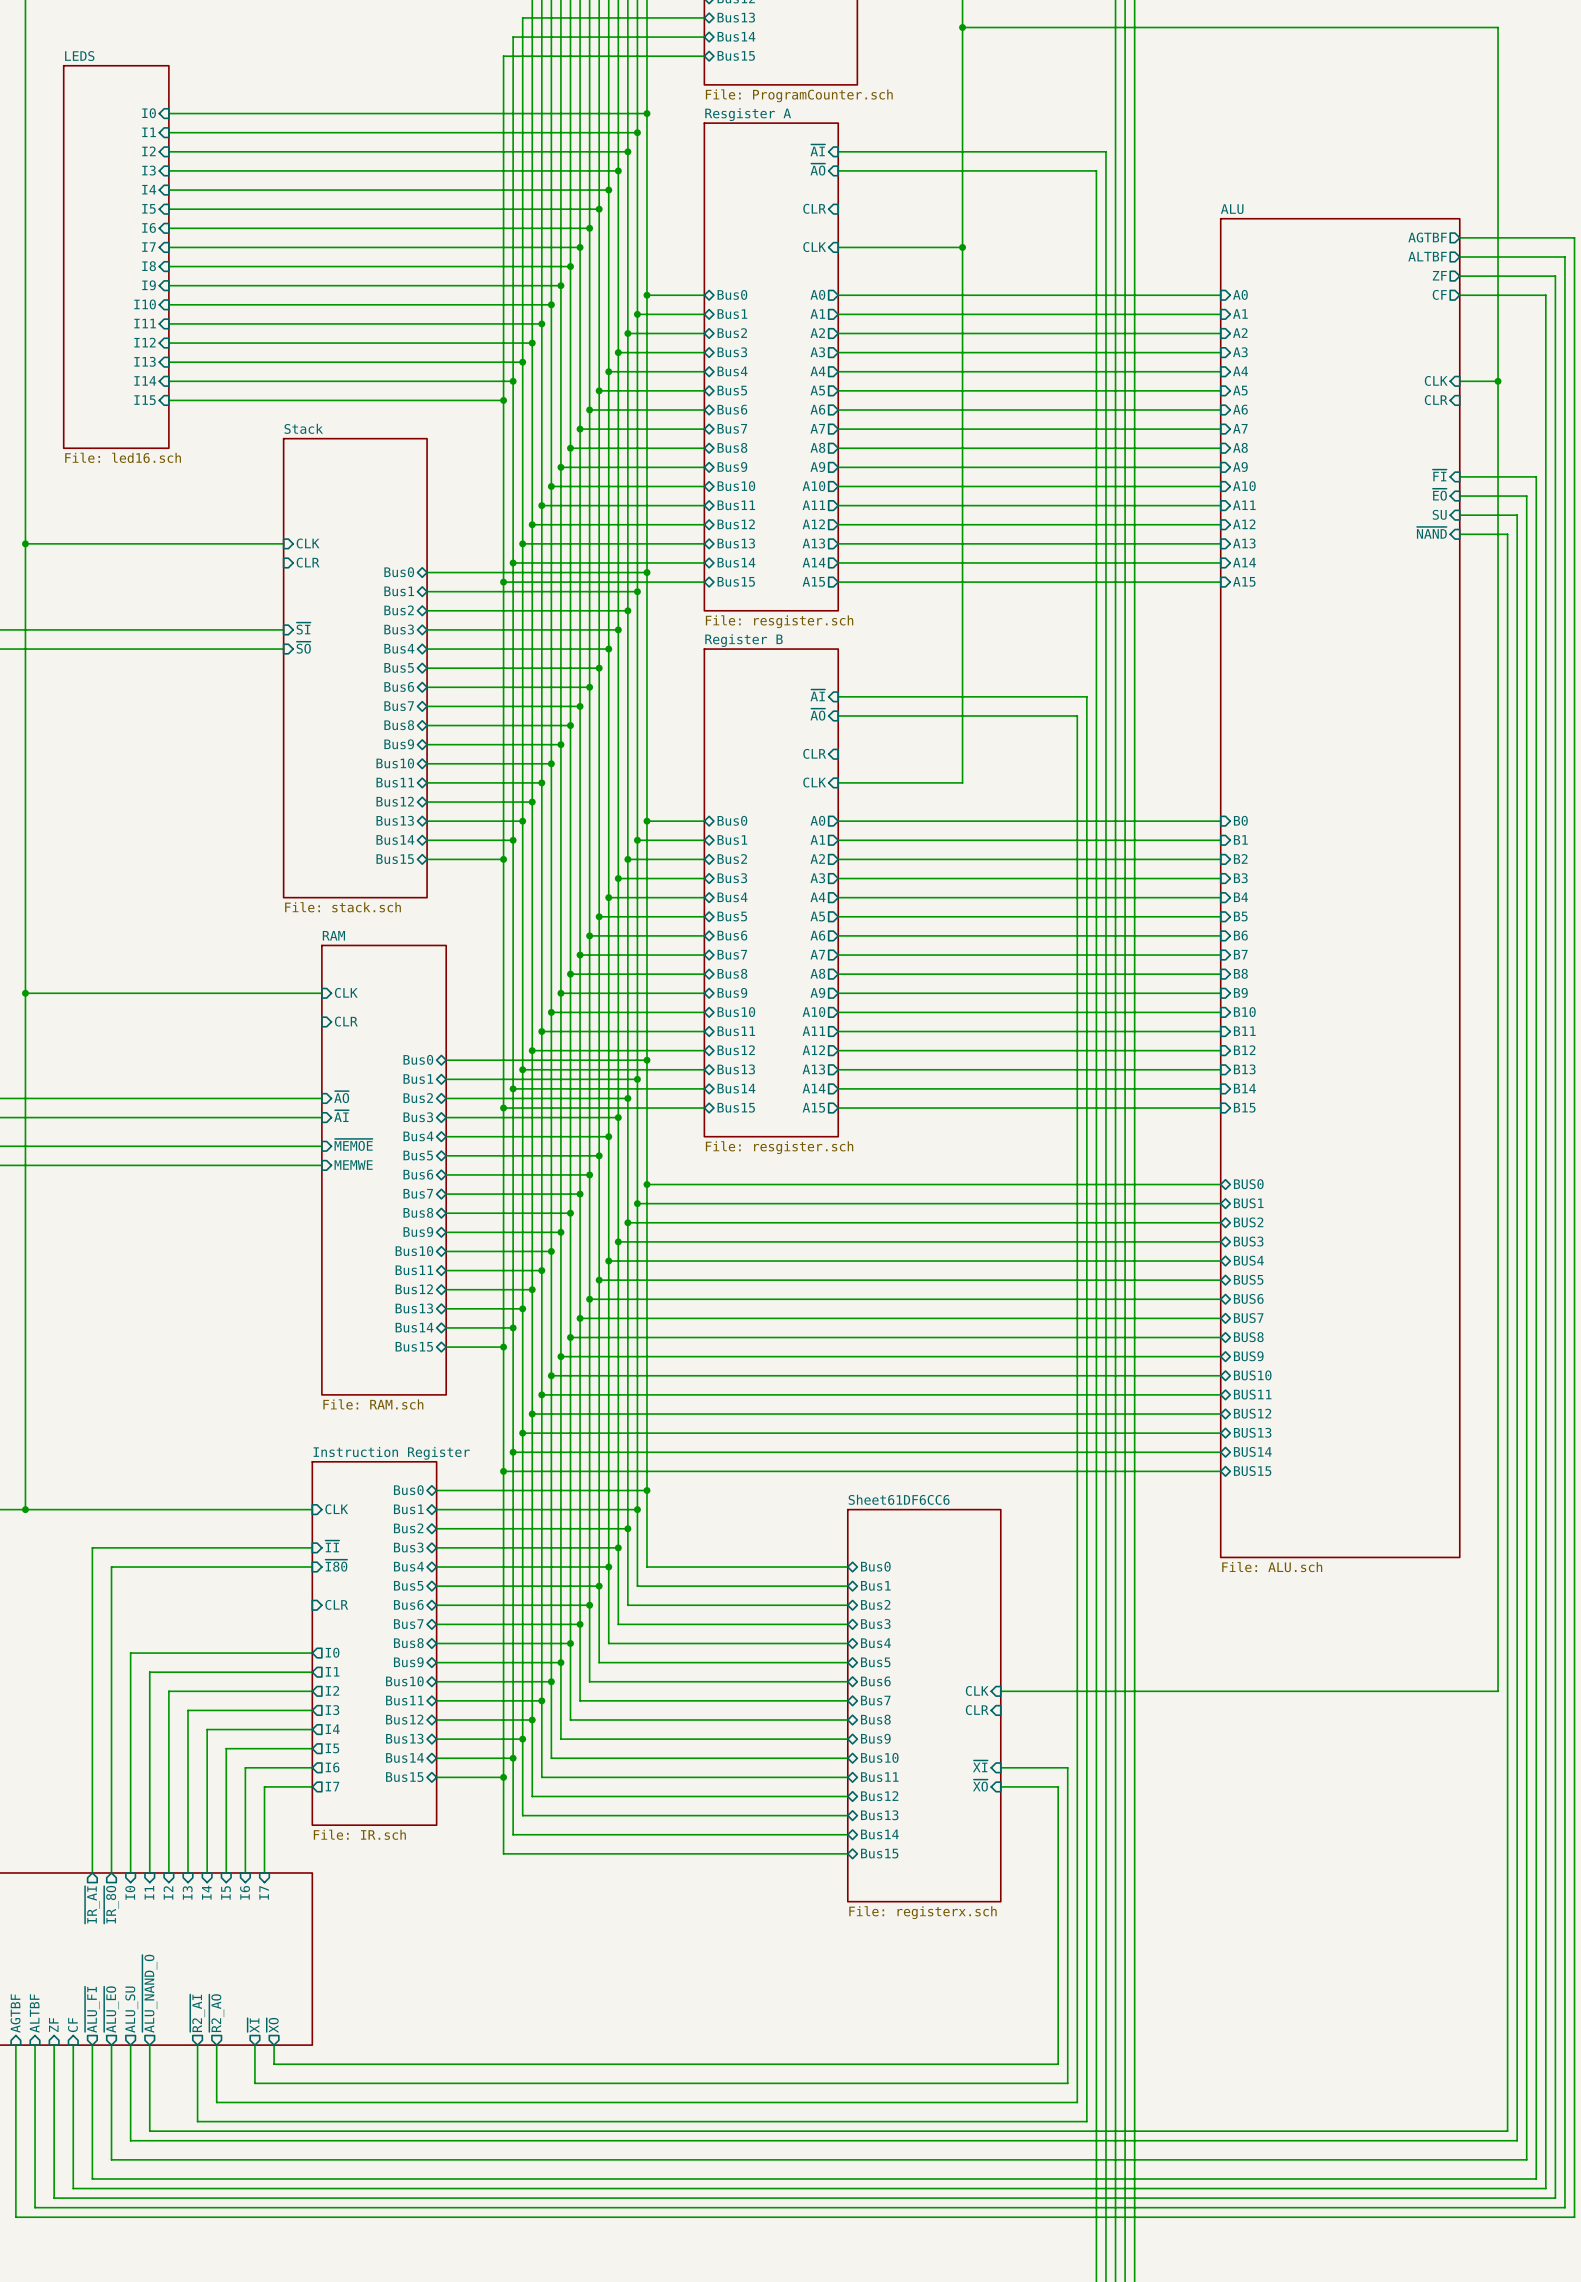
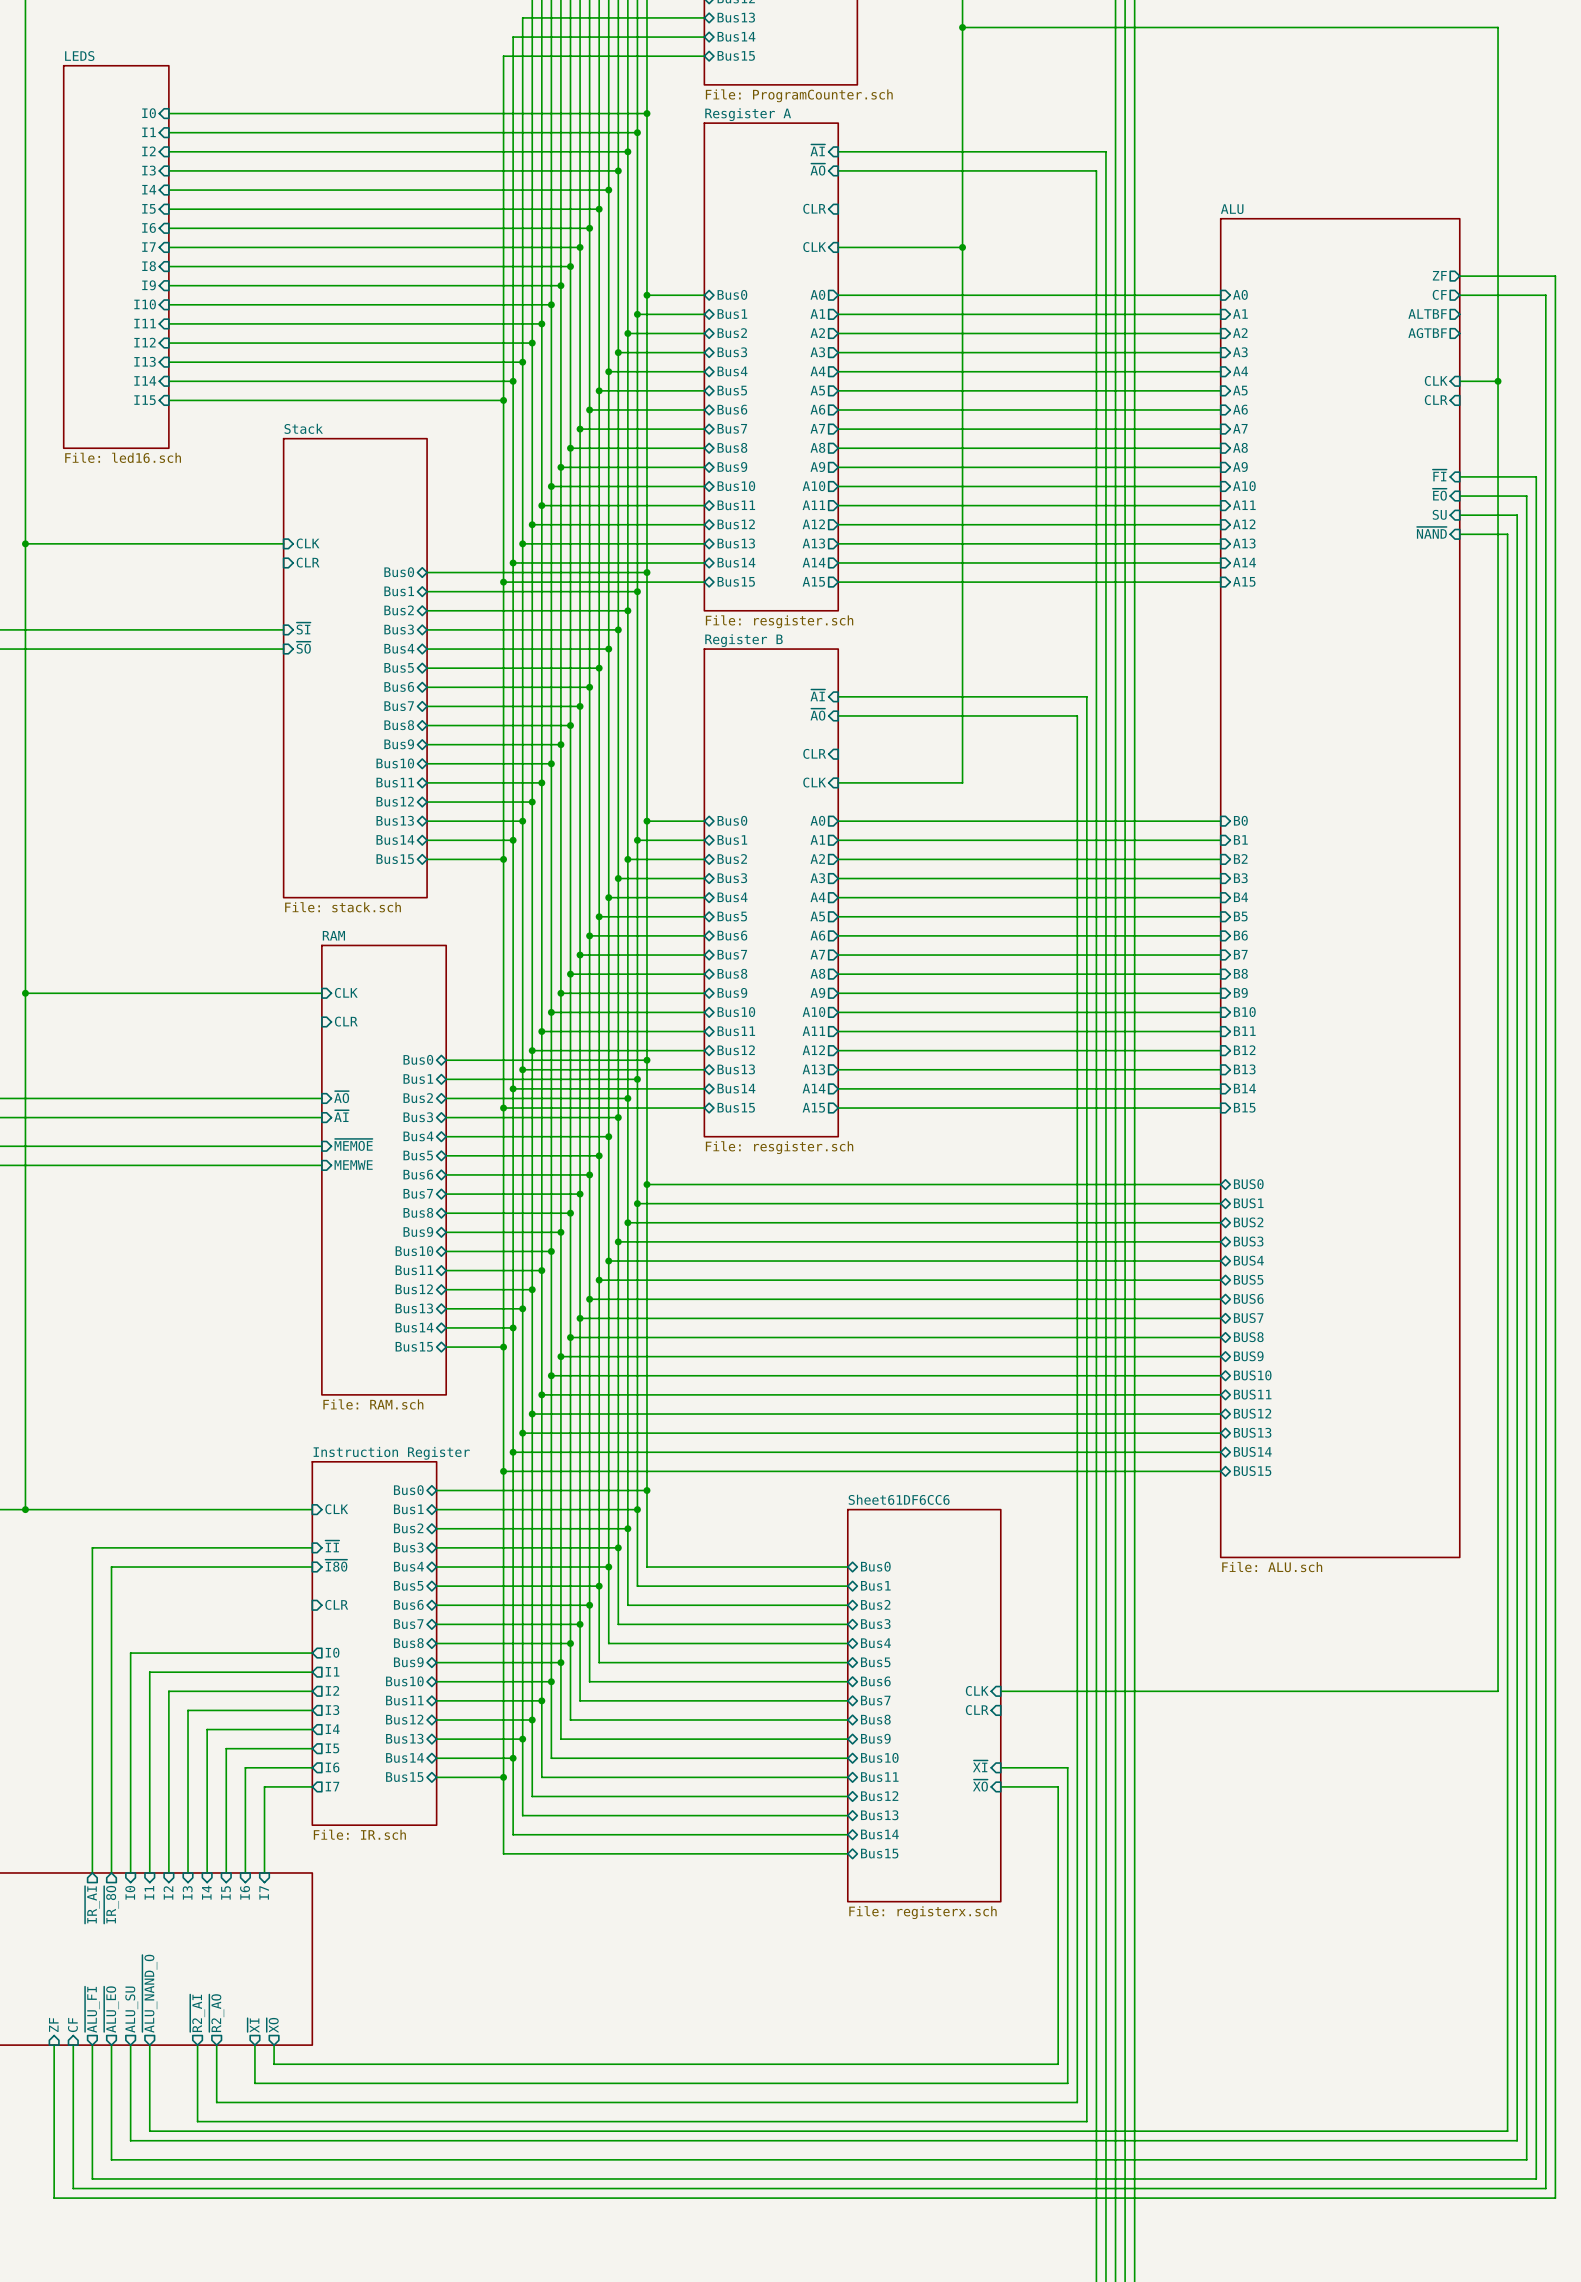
sheet pin position: AGTBF (1427, 237) -> AGTBF (1427, 333)
wire: (1459, 237) (1574, 237) (1574, 2217) (15, 2217) (15, 2045) -> none
sheet pin position: ALTBF (1427, 256) -> ALTBF (1427, 314)
wire: (1459, 256) (1564, 256) (1564, 2207) (35, 2207) (35, 2045) -> none
sheet pin: AGTBF (15, 2013) -> none
sheet pin: ALTBF (34, 2013) -> none

